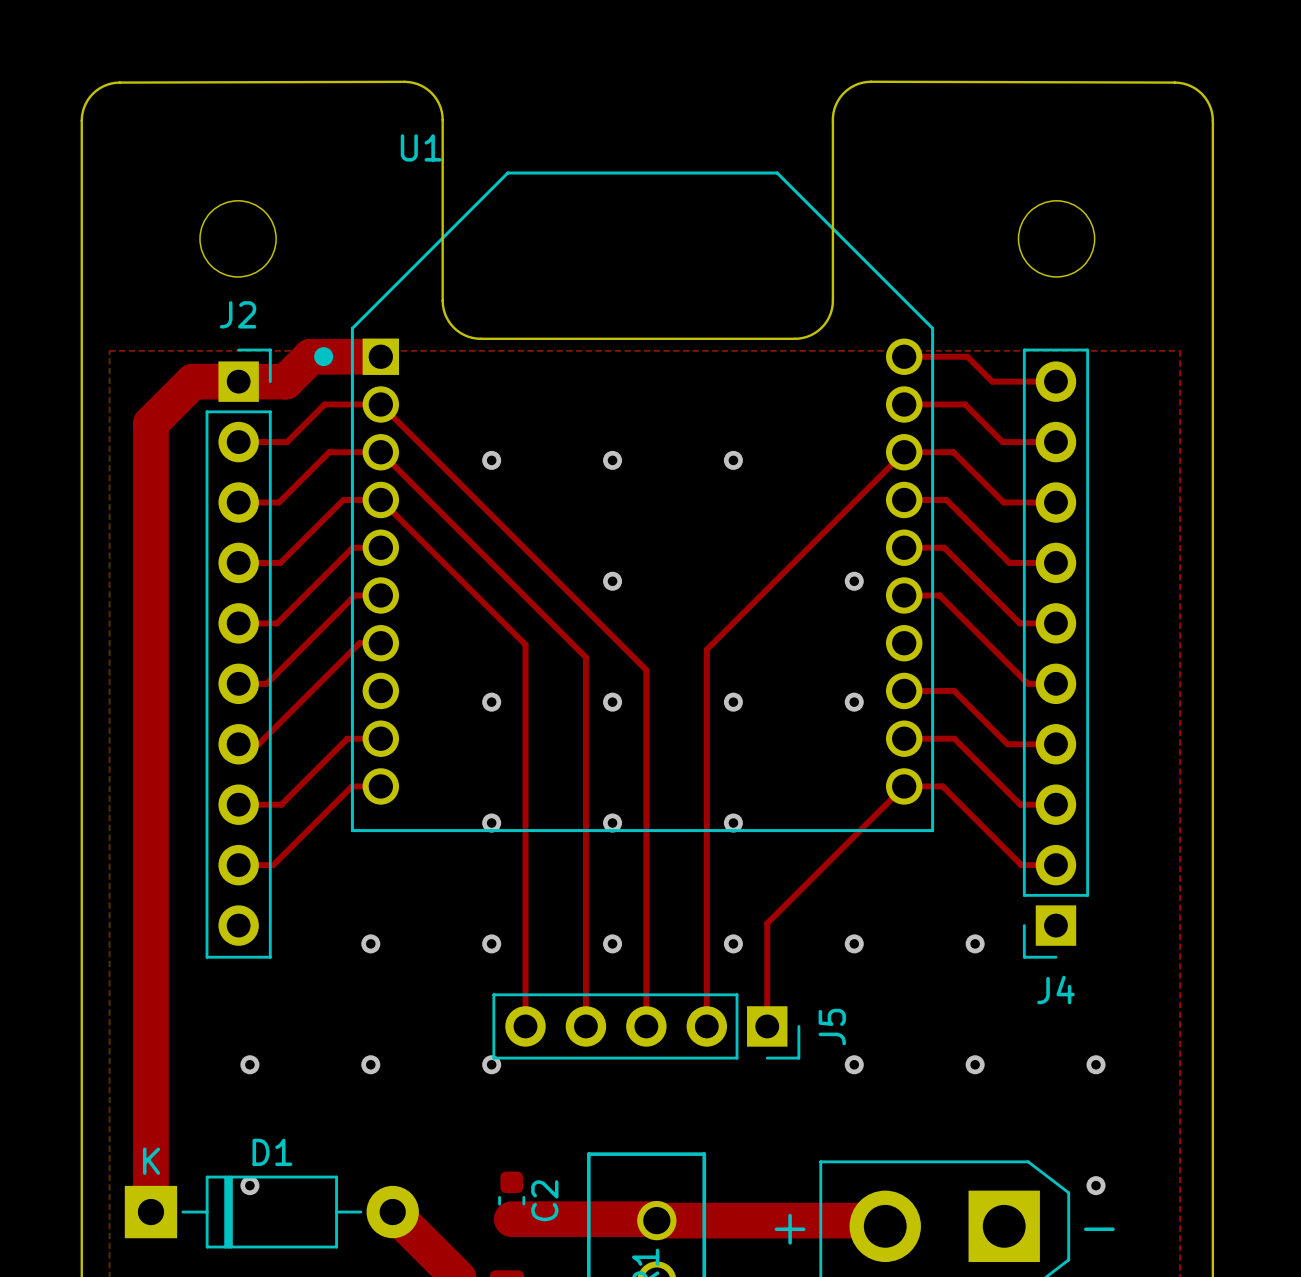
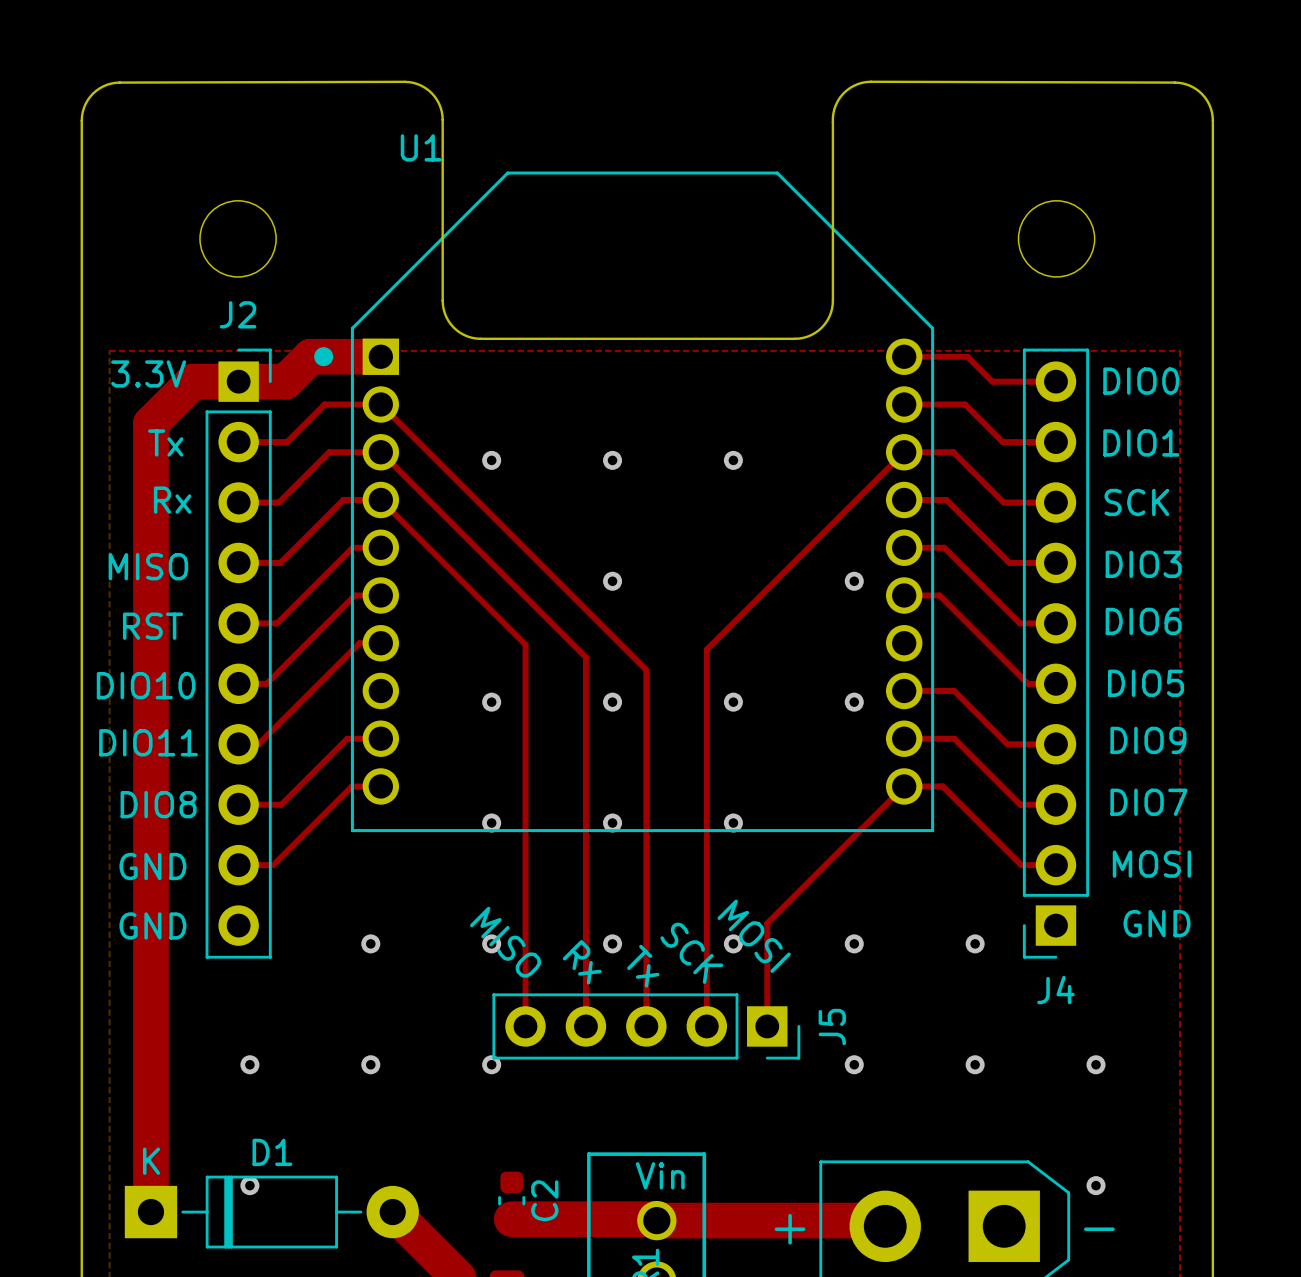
text: none -> 3.3V (148, 373)
text: none -> DIO0 (1141, 381)
text: none -> Tx (165, 442)
text: none -> DIO1 (1141, 442)
text: none -> Rx (172, 500)
text: none -> SCK (1136, 502)
text: none -> DIO3 (1143, 564)
text: none -> MISO (148, 566)
text: none -> DIO6 (1143, 621)
text: none -> RST (153, 626)
text: none -> DIO5 (1146, 683)
text: none -> DIO10 (146, 685)
text: none -> DIO9 (1148, 740)
text: none -> DIO11 (148, 742)
text: none -> DIO7 (1148, 802)
text: none -> DIO8 (158, 804)
text: none -> MOSI (1151, 864)
text: none -> GND (152, 866)
text: none -> GND (1157, 923)
text: none -> GND (152, 925)
text: none -> MOSI (754, 936)
text: none -> MISO (505, 942)
text: none -> SCK (691, 953)
text: none -> Rx (582, 962)
text: none -> Tx (643, 966)
text: none -> Vin (660, 1175)

